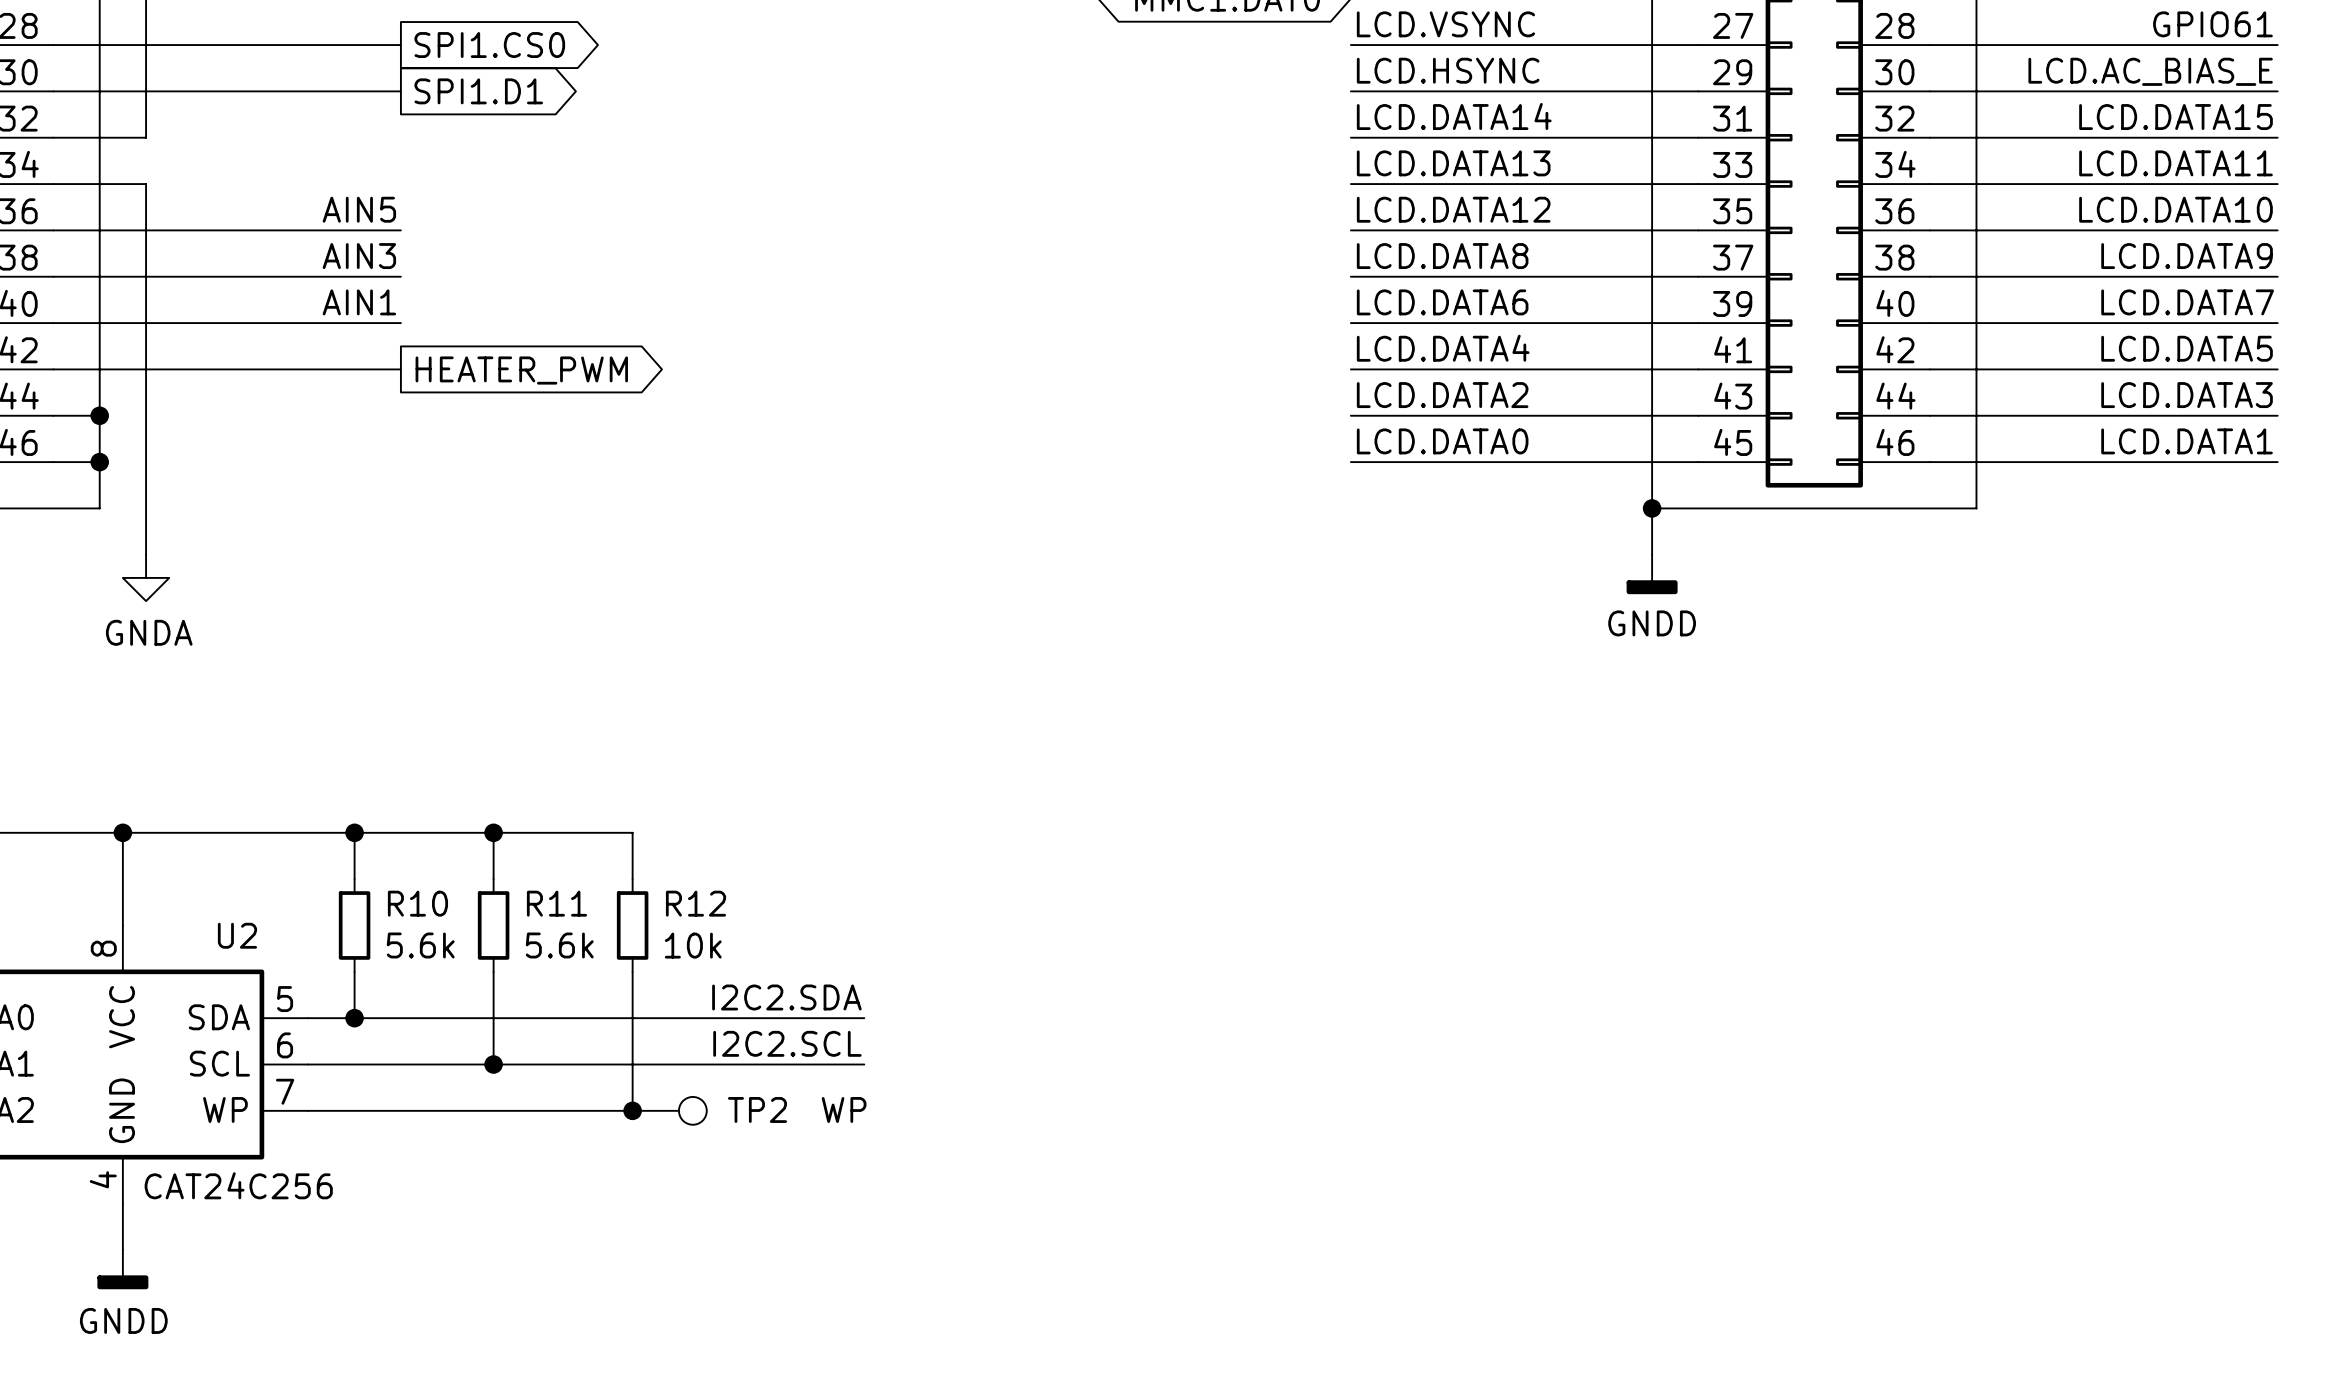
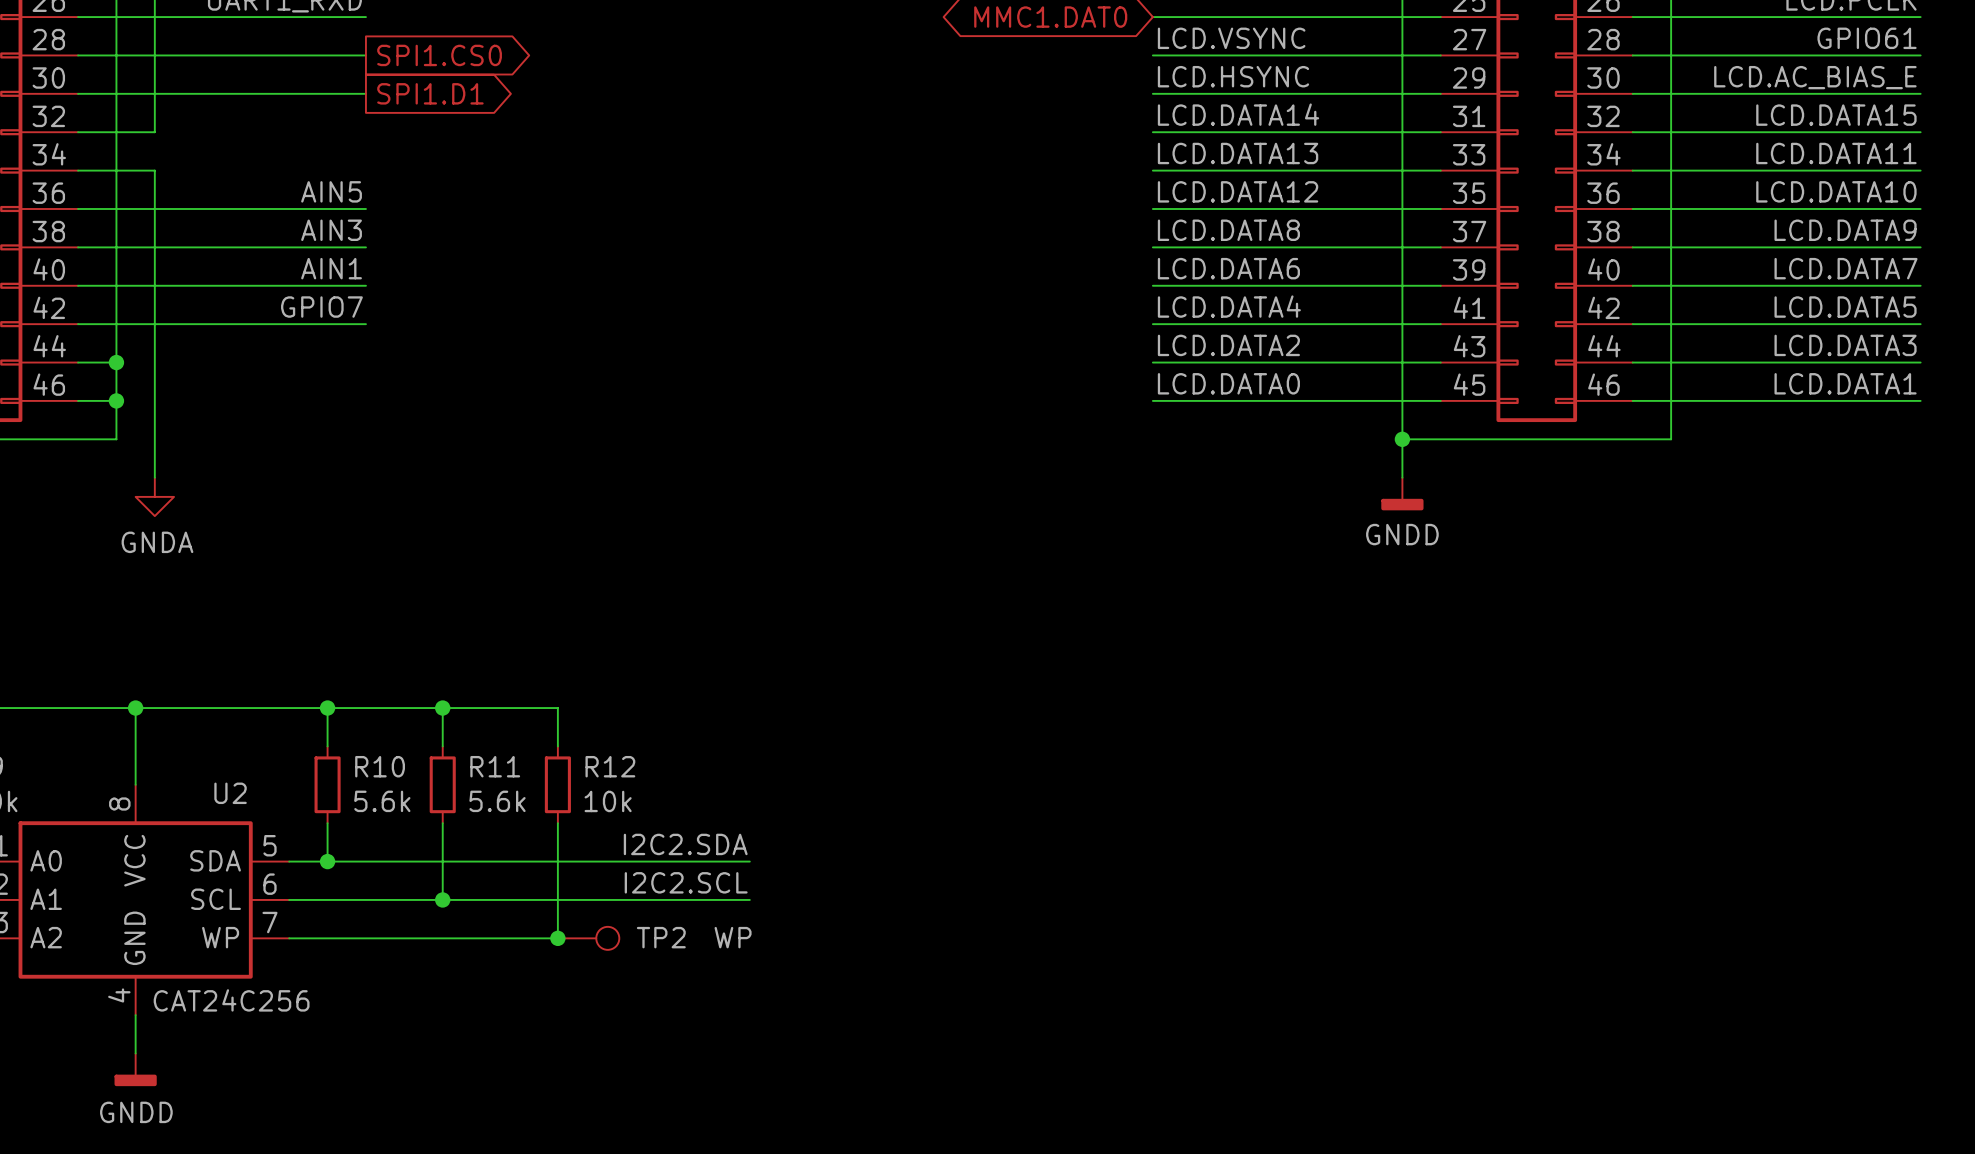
label: none -> GPIO7 (321, 307)
global label: HEATER_PWM (521, 370) -> none

